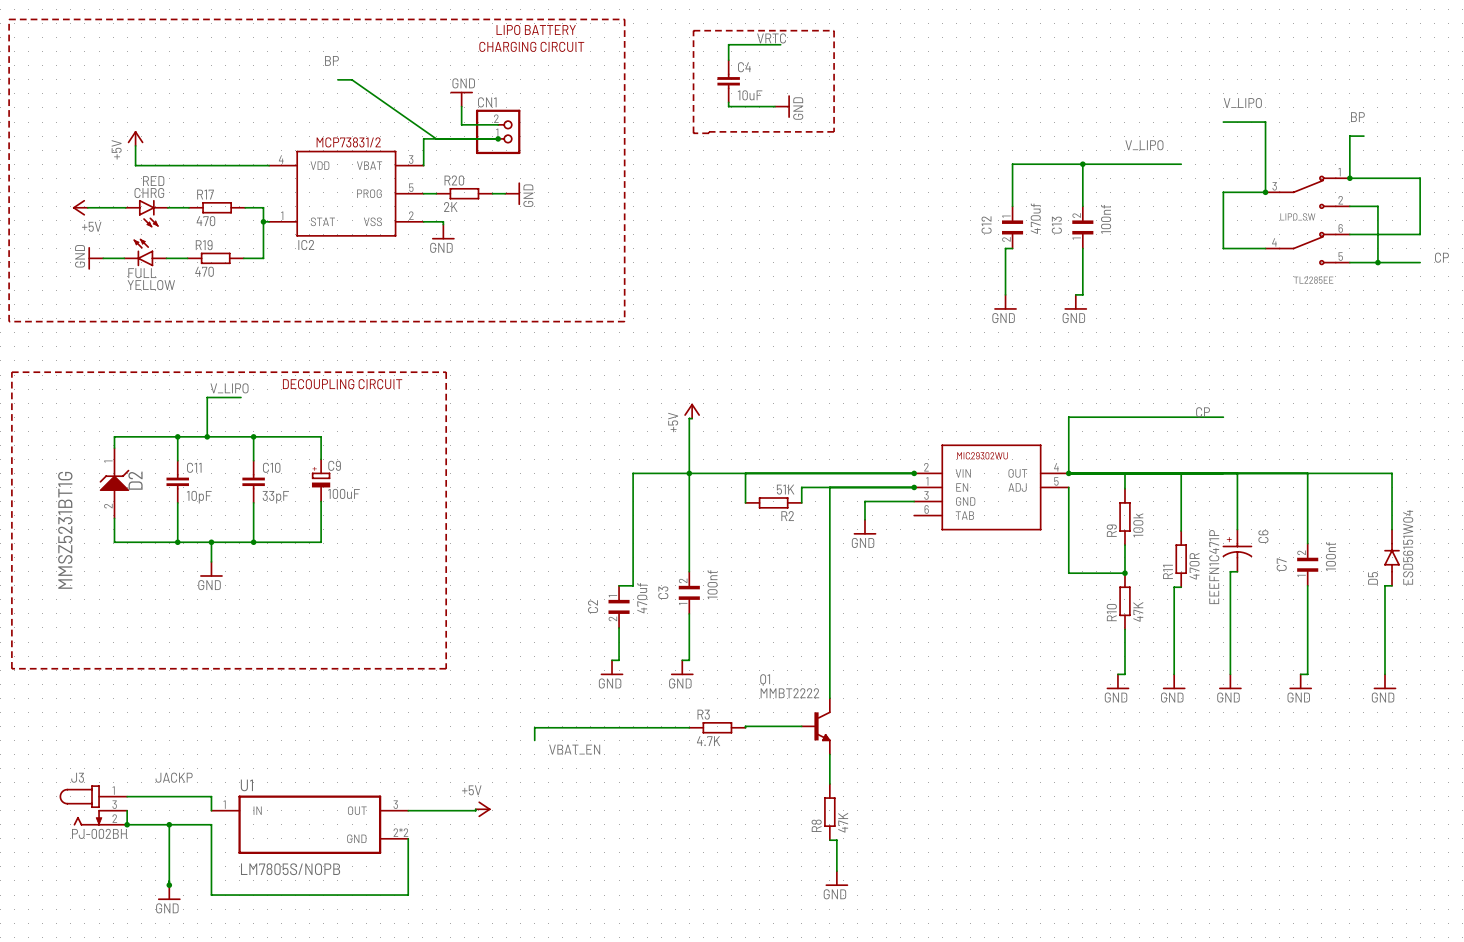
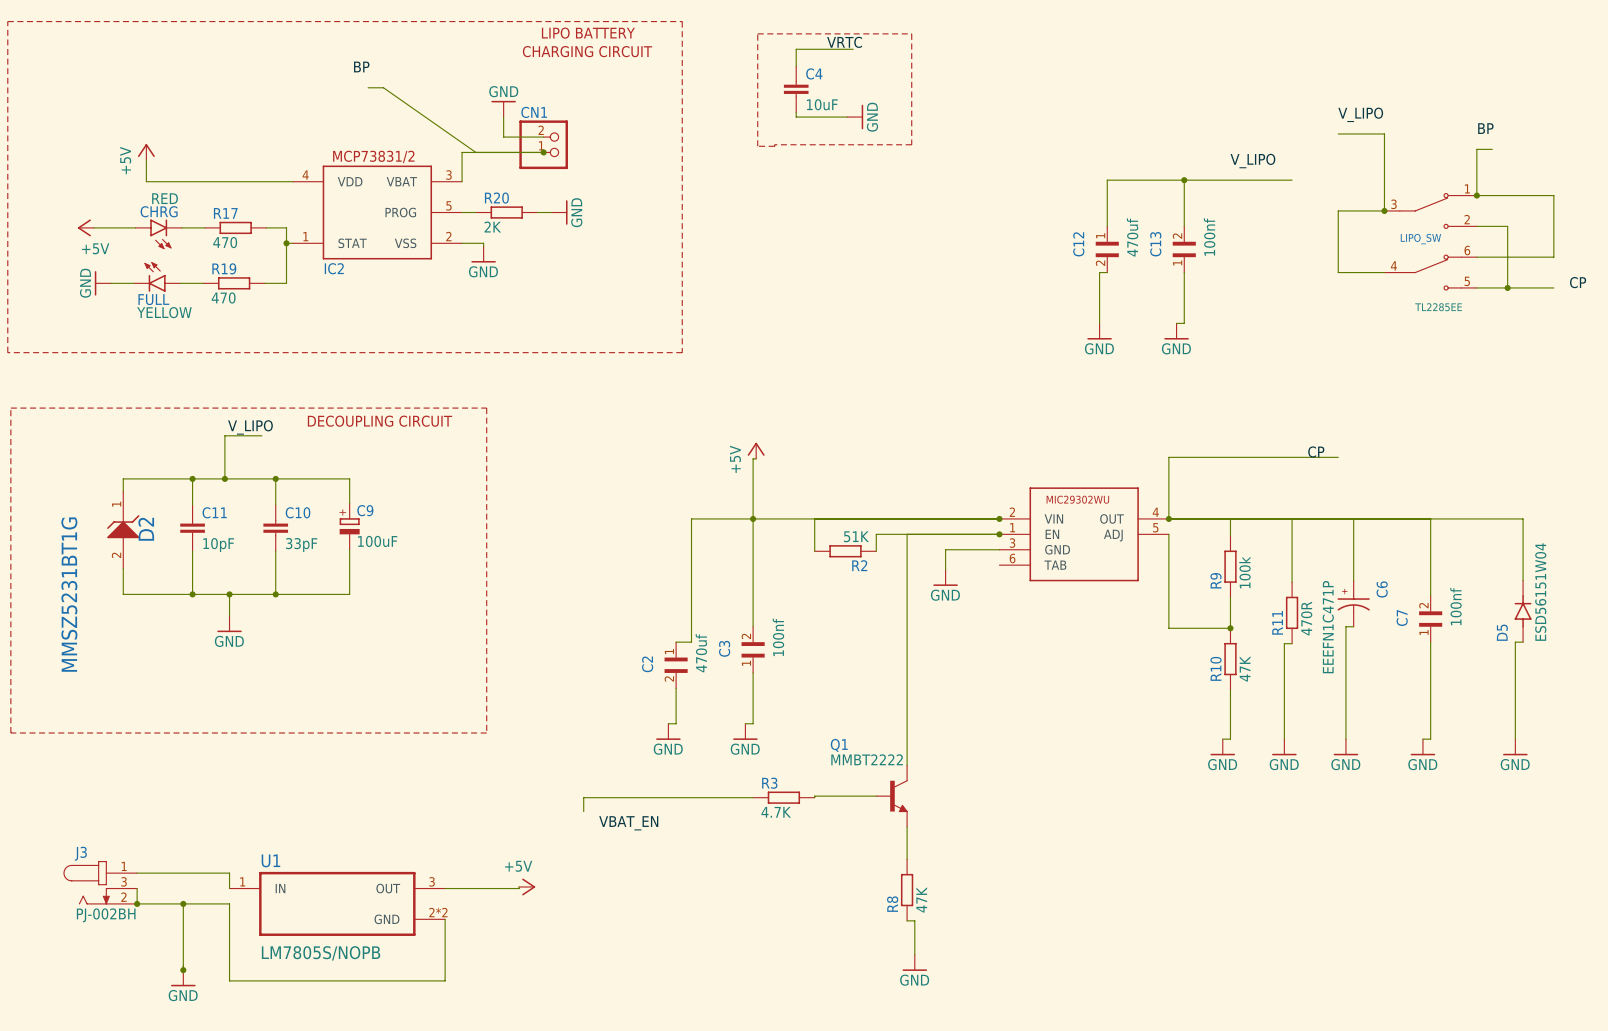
label: JACKP (174, 777) -> none

